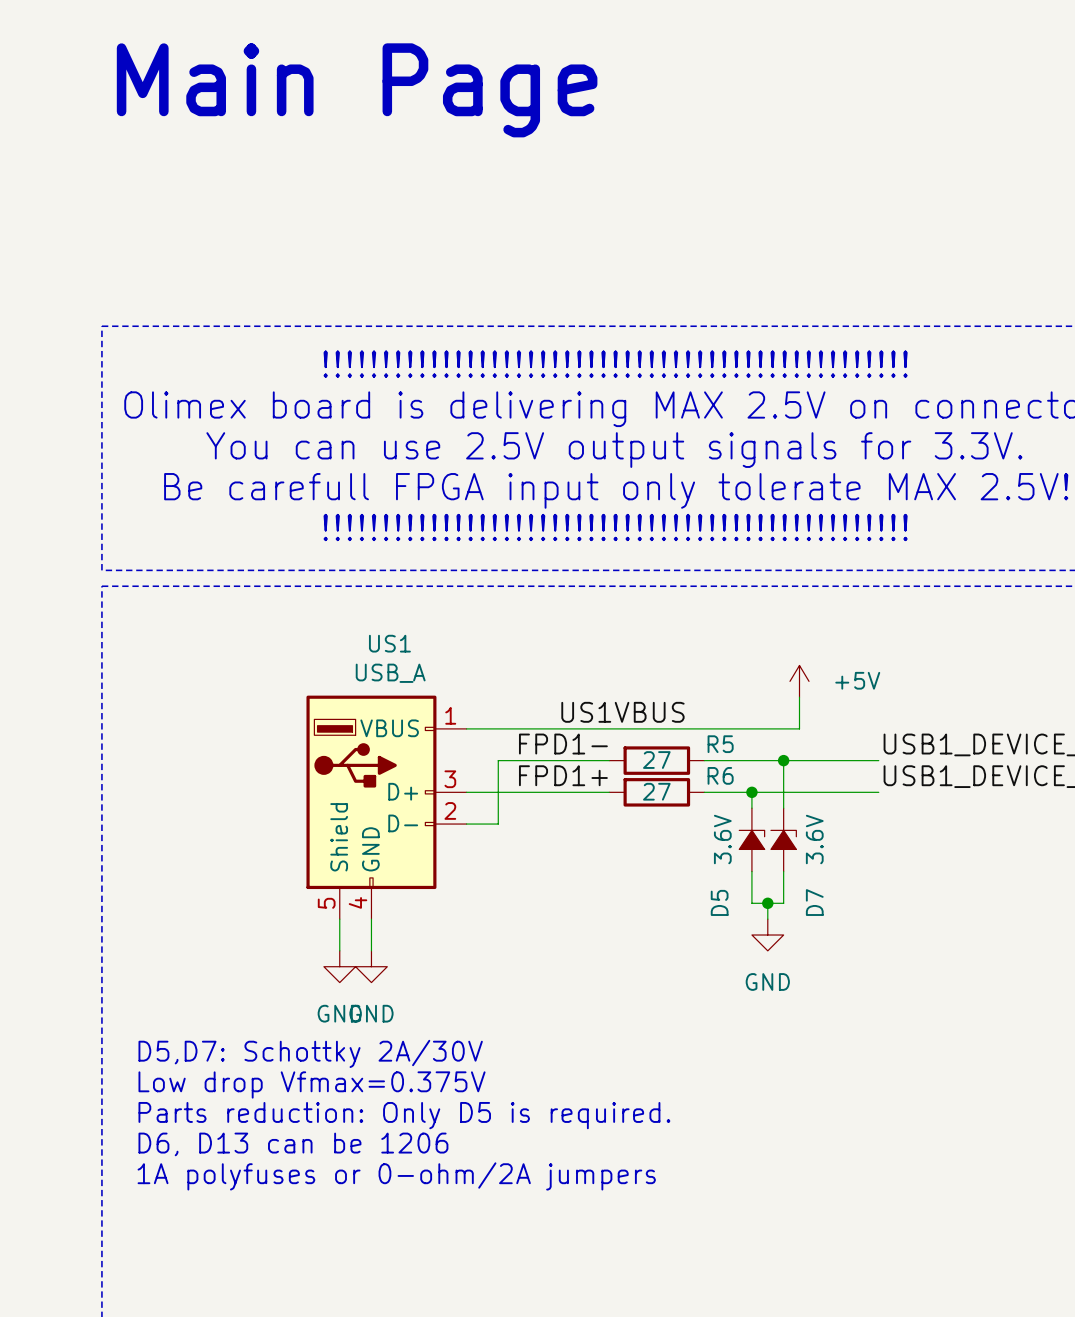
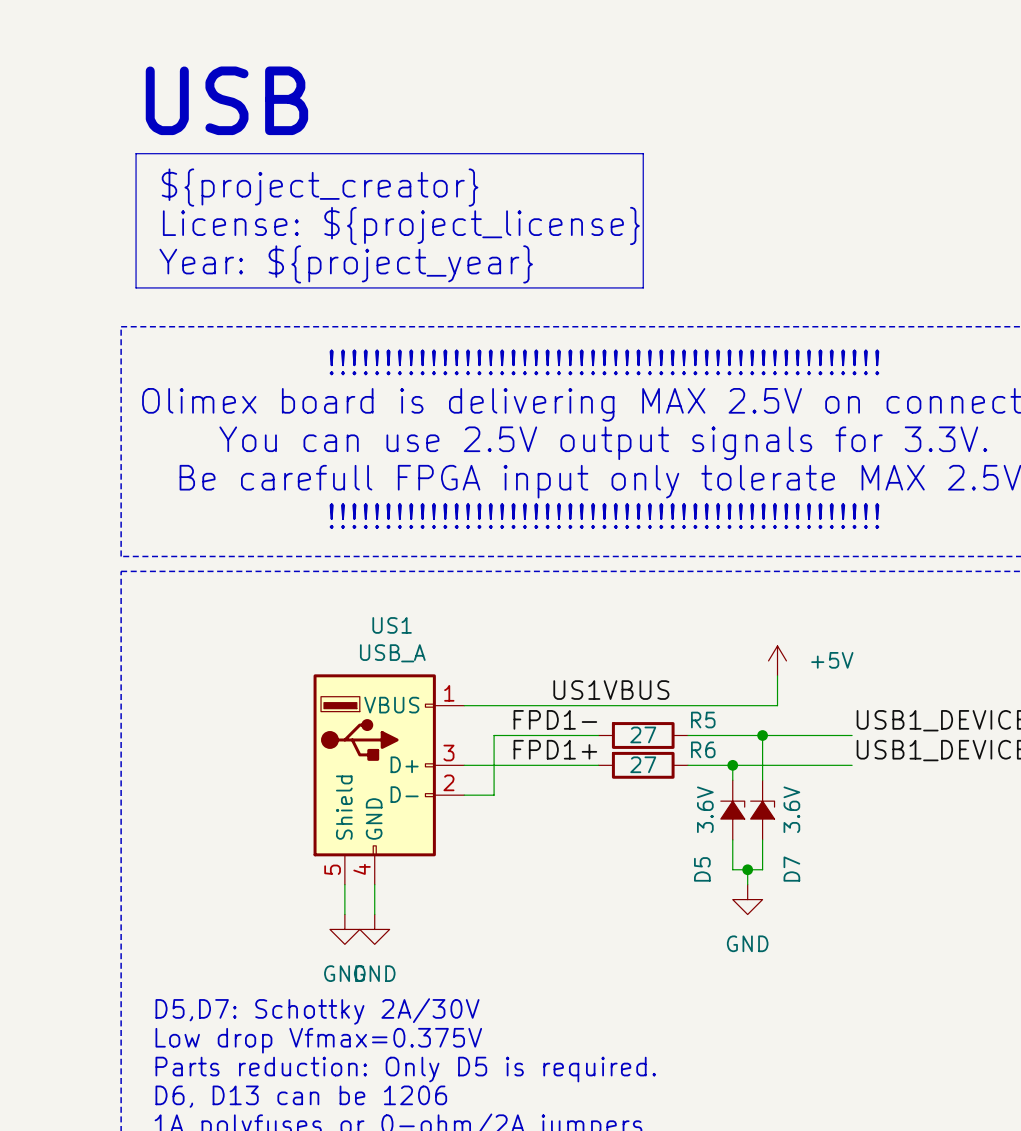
text: none -> USB (226, 100)
text: Main Page (357, 90) -> none
line: none -> (136, 153) (643, 153) (643, 287) (136, 287) (136, 153)
text: none -> ${project_creator} (320, 187)
text: none -> License: ${project_license} (401, 225)
text: none -> Year: ${project_year} (346, 264)

